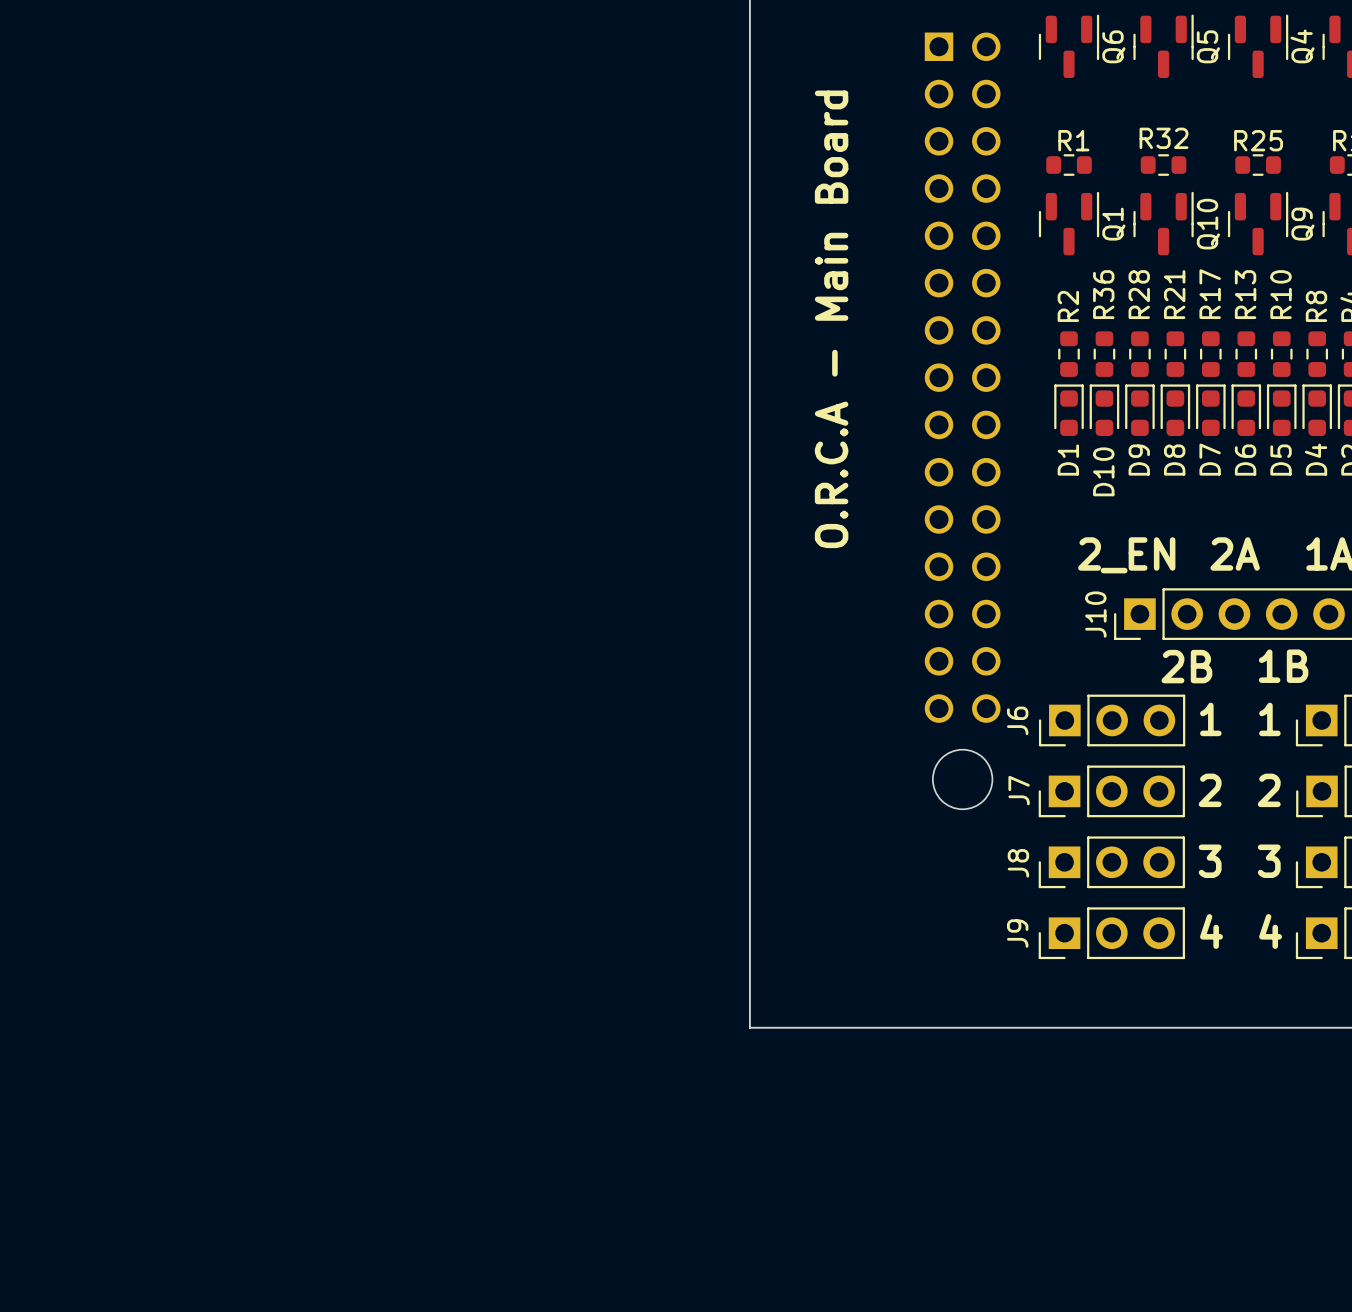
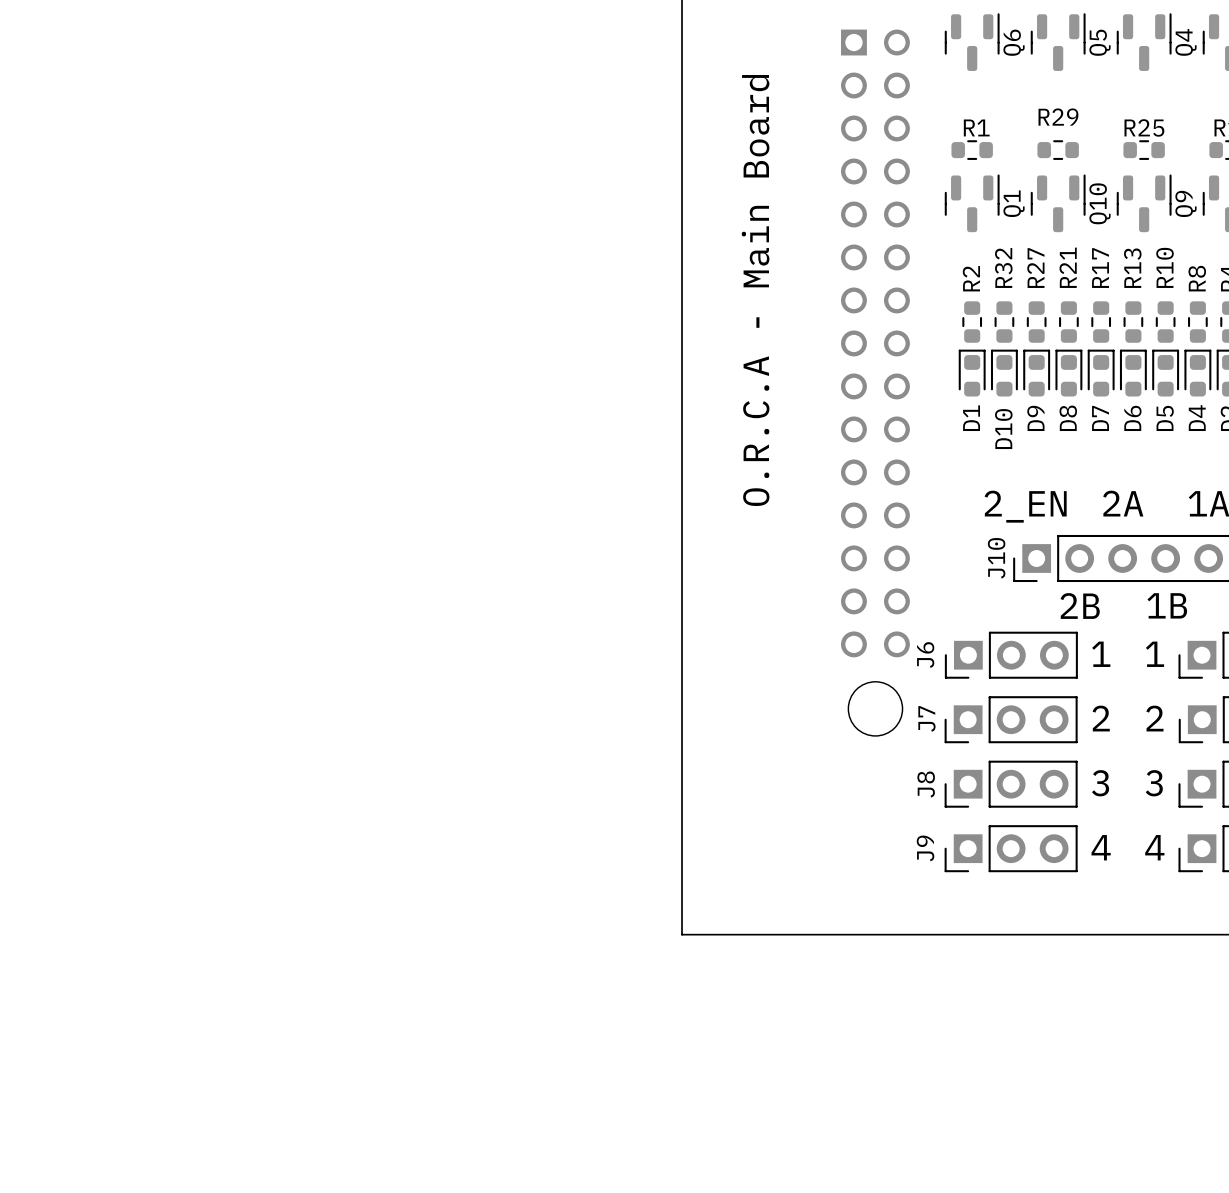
R32 name: R32 (1164, 138) -> R29 (1058, 117)
R36 name: R36 (1103, 294) -> R32 (1003, 267)
R28 name: R28 (1139, 294) -> R27 (1035, 268)

